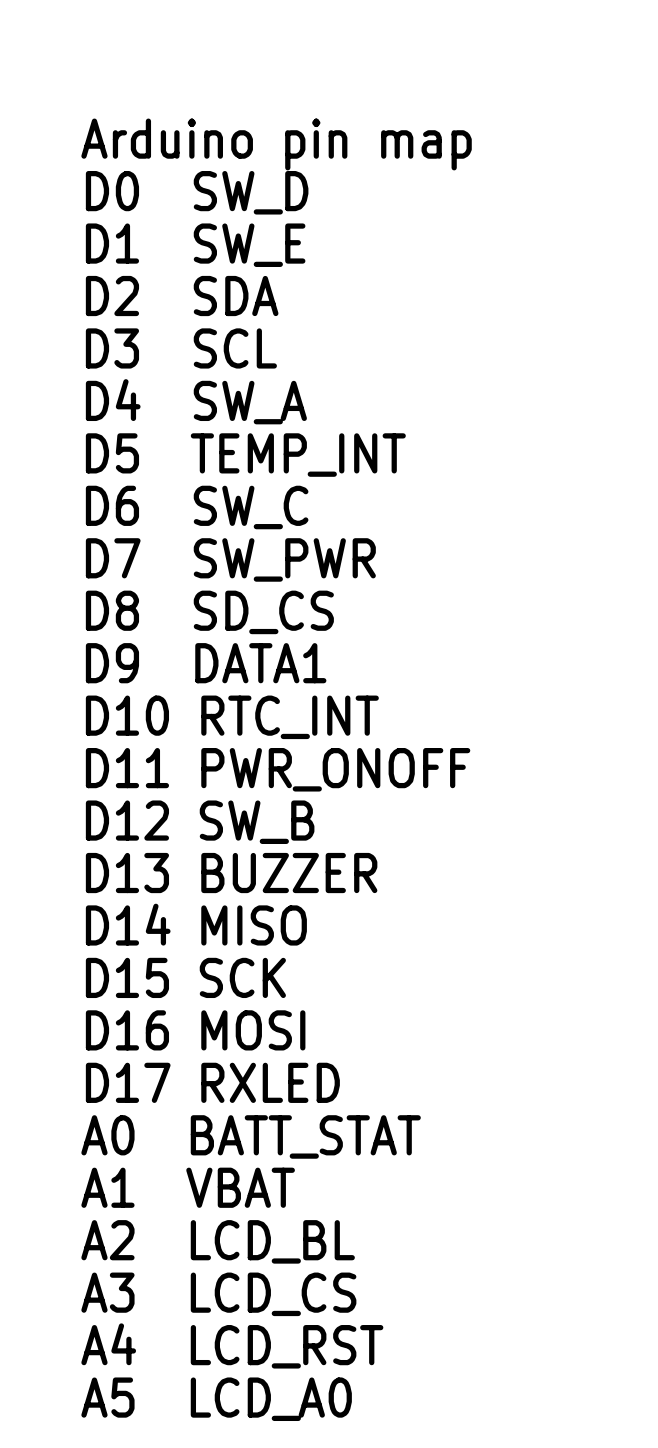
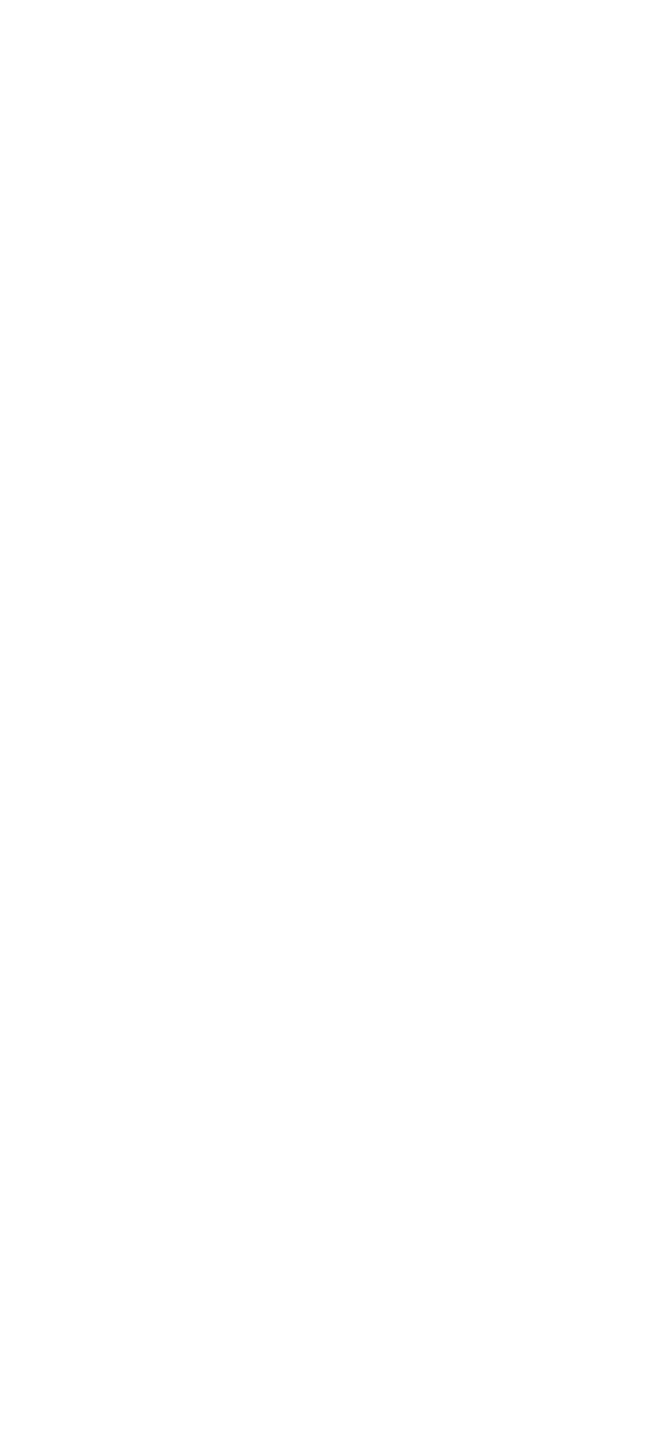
text: Arduino pin map (276, 144) -> none
text: D0 SW_D (197, 192) -> none
text: D1 SW_E (195, 245) -> none
text: D2 SDA (182, 296) -> none
text: D3 SCL (181, 348) -> none
text: D4 SW_A (196, 401) -> none
text: D5 TEMP_INT (245, 455) -> none
text: D6 SW_C (197, 507) -> none
text: D7 SW_PWR (230, 559) -> none
text: D8 SD_CS (209, 612) -> none
text: D9 DATA1 (206, 663) -> none
text: D10 RTC_INT (232, 717) -> none
text: D11 PWR_ONOFF (278, 769) -> none
text: D12 SW_B (200, 822) -> none
text: D13 BUZZER (231, 873) -> none
text: D14 MISO (196, 924) -> none
text: D15 SCK (185, 977) -> none
text: D16 MOSI (195, 1030) -> none
text: D17 RXLED (212, 1082) -> none
text: A0 BATT_STAT (251, 1136) -> none
text: A1 VBAT (188, 1187) -> none
text: A2 LCD_BL (218, 1241) -> none
text: A3 LCD_CS (218, 1294) -> none
text: A4 LCD_RST (232, 1345) -> none
text: A5 LCD_A0 (216, 1399) -> none

